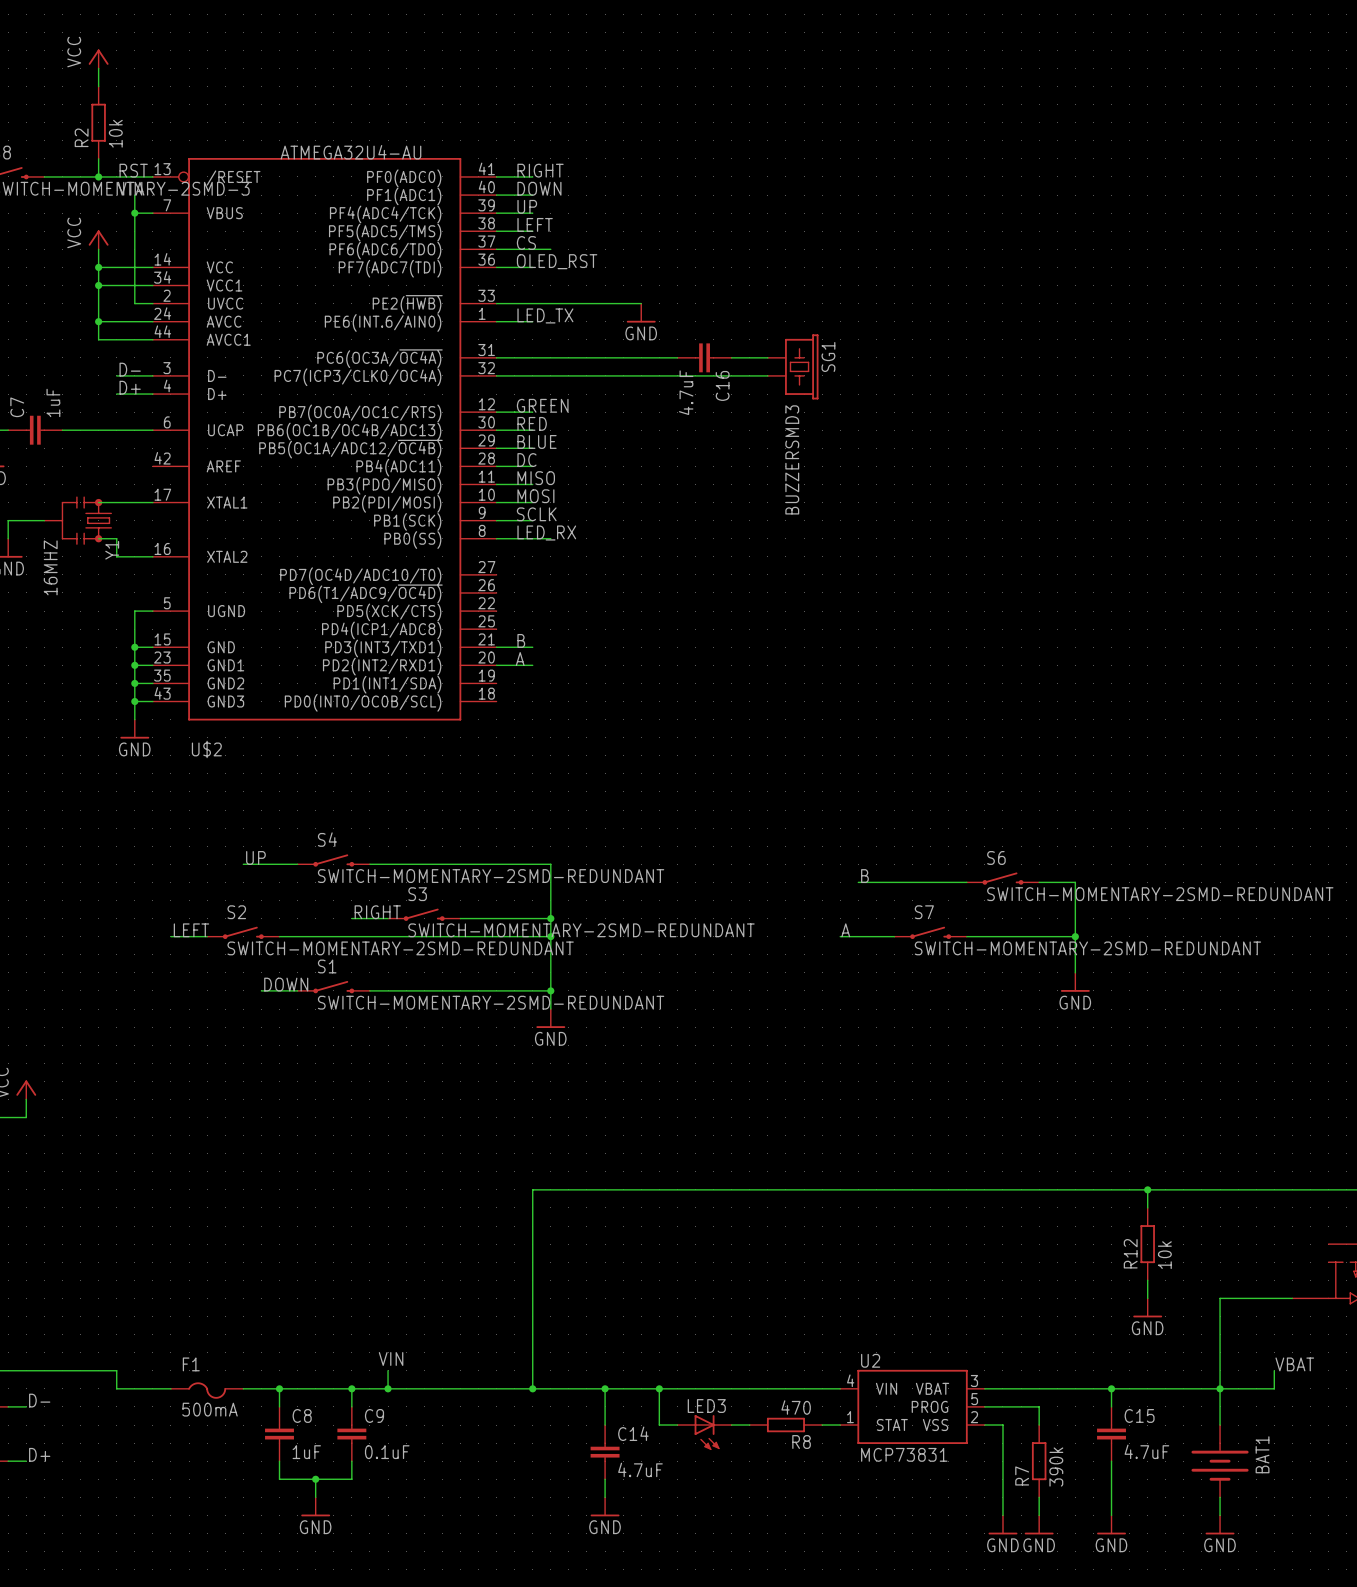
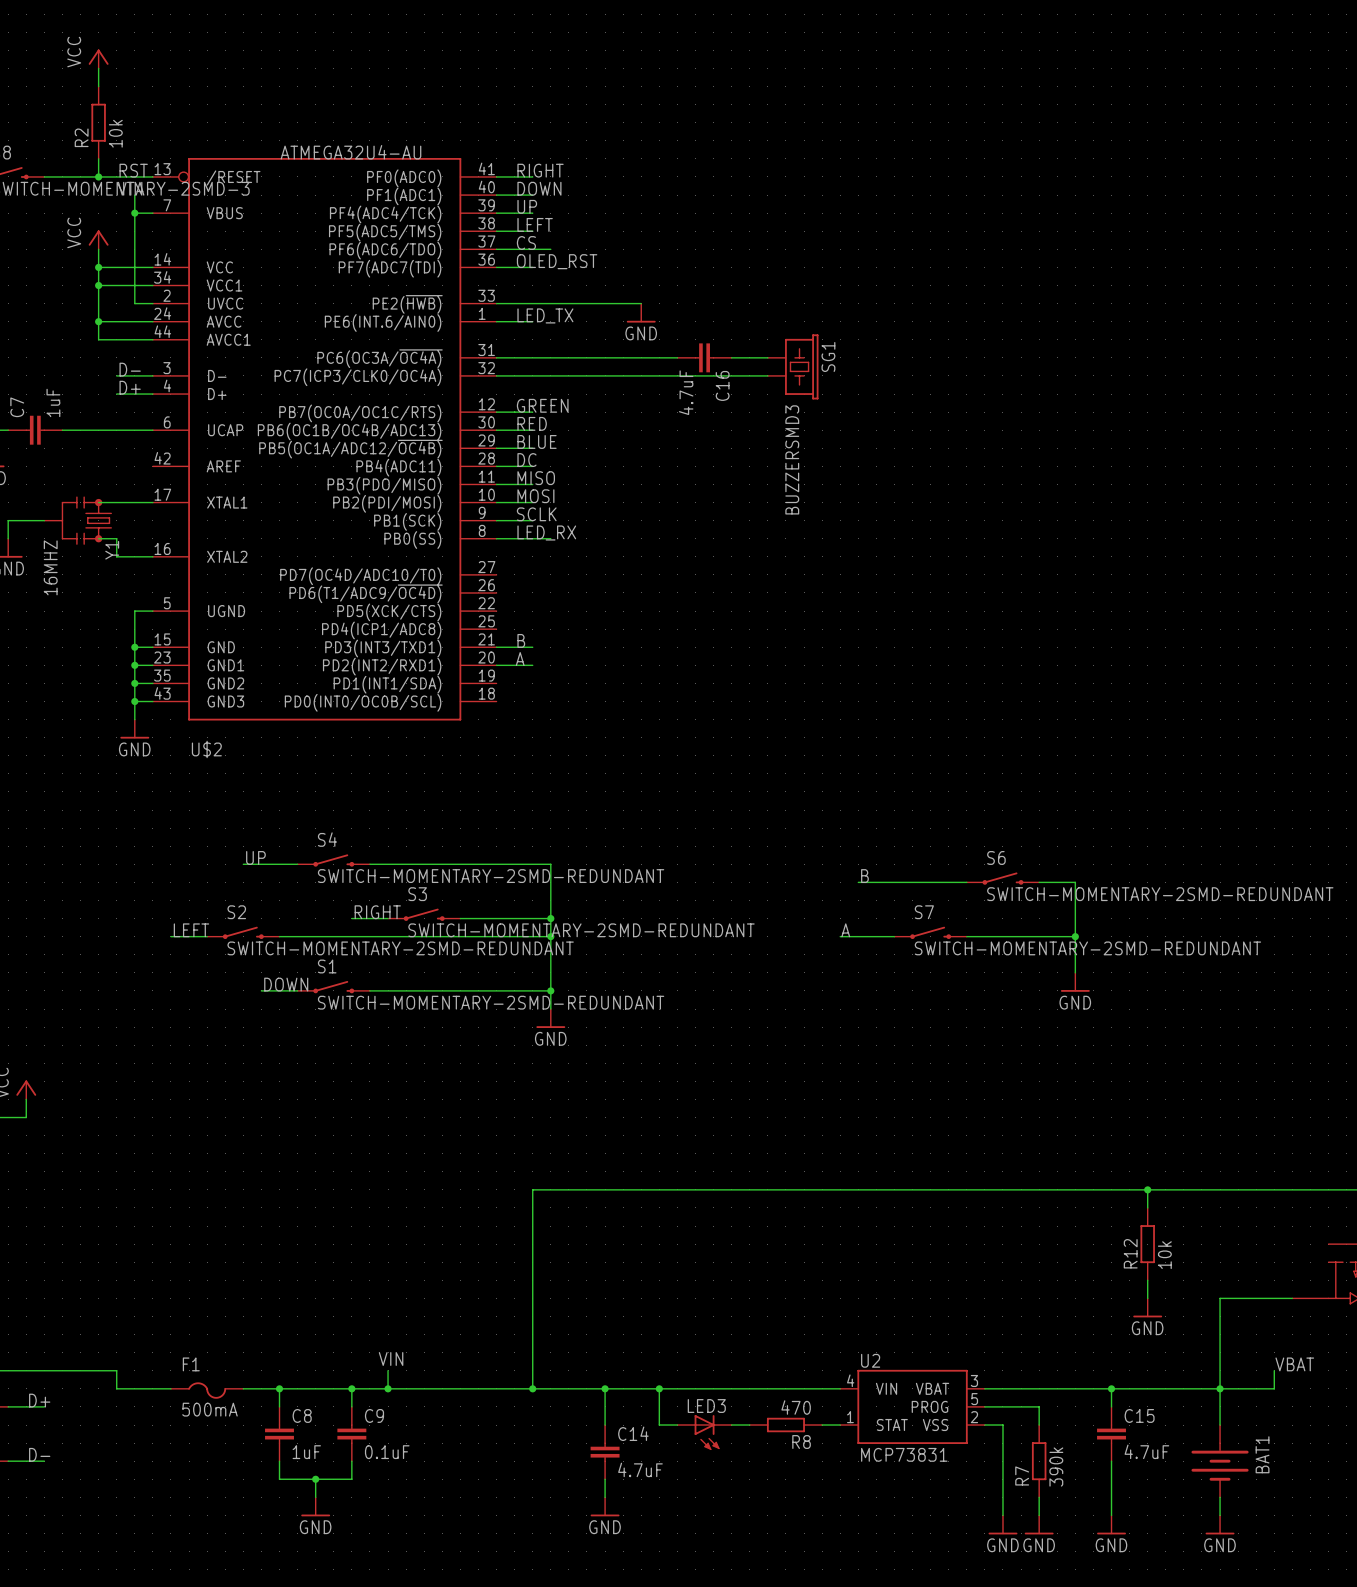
label: D- (39, 1400) -> D+ (39, 1400)
wire: none -> (26, 1406) (44, 1406)
label: D+ (39, 1454) -> D- (39, 1454)
wire: none -> (26, 1461) (44, 1461)

